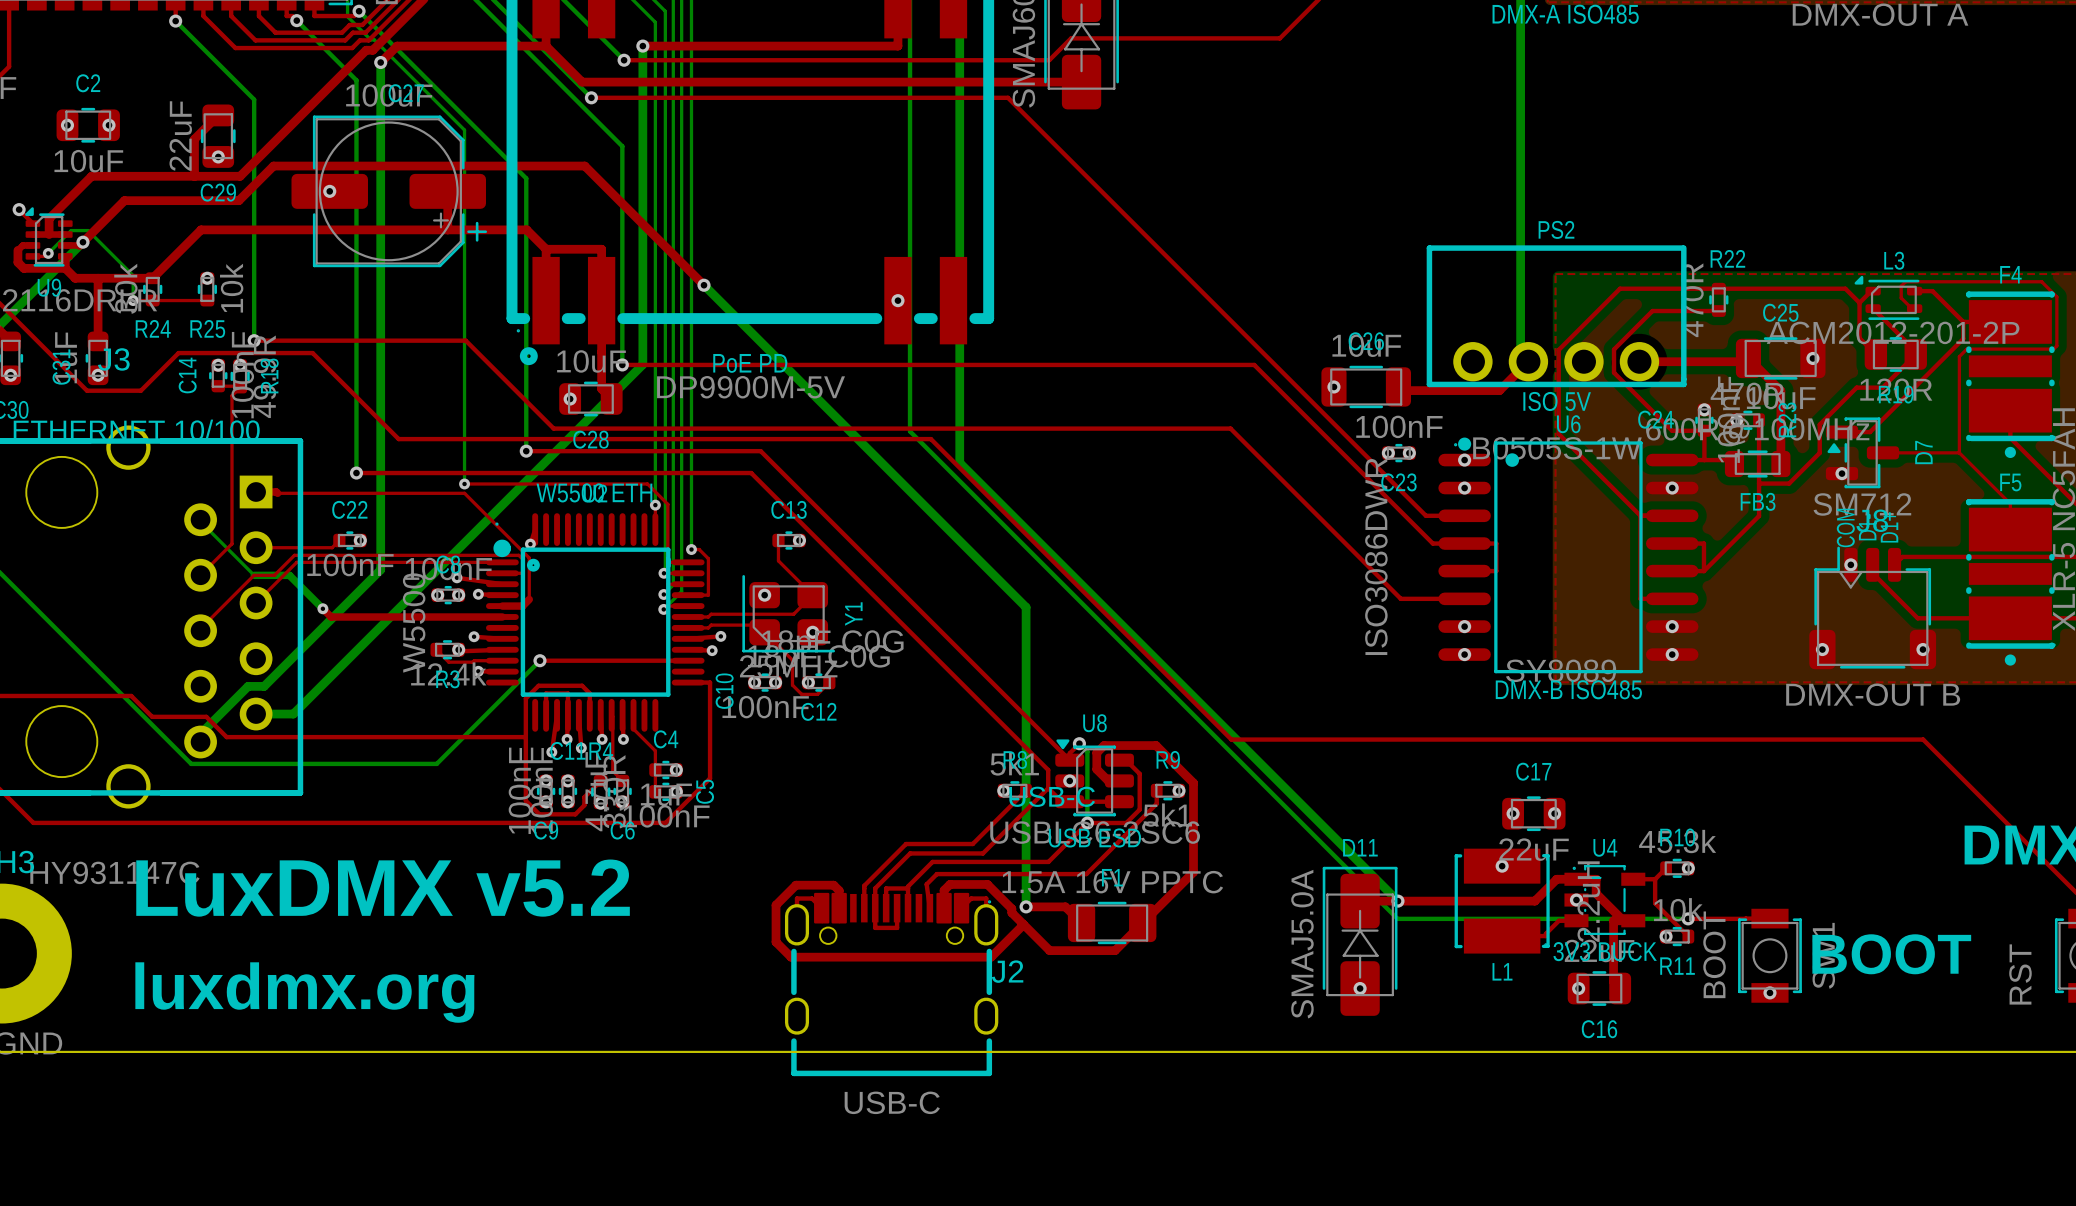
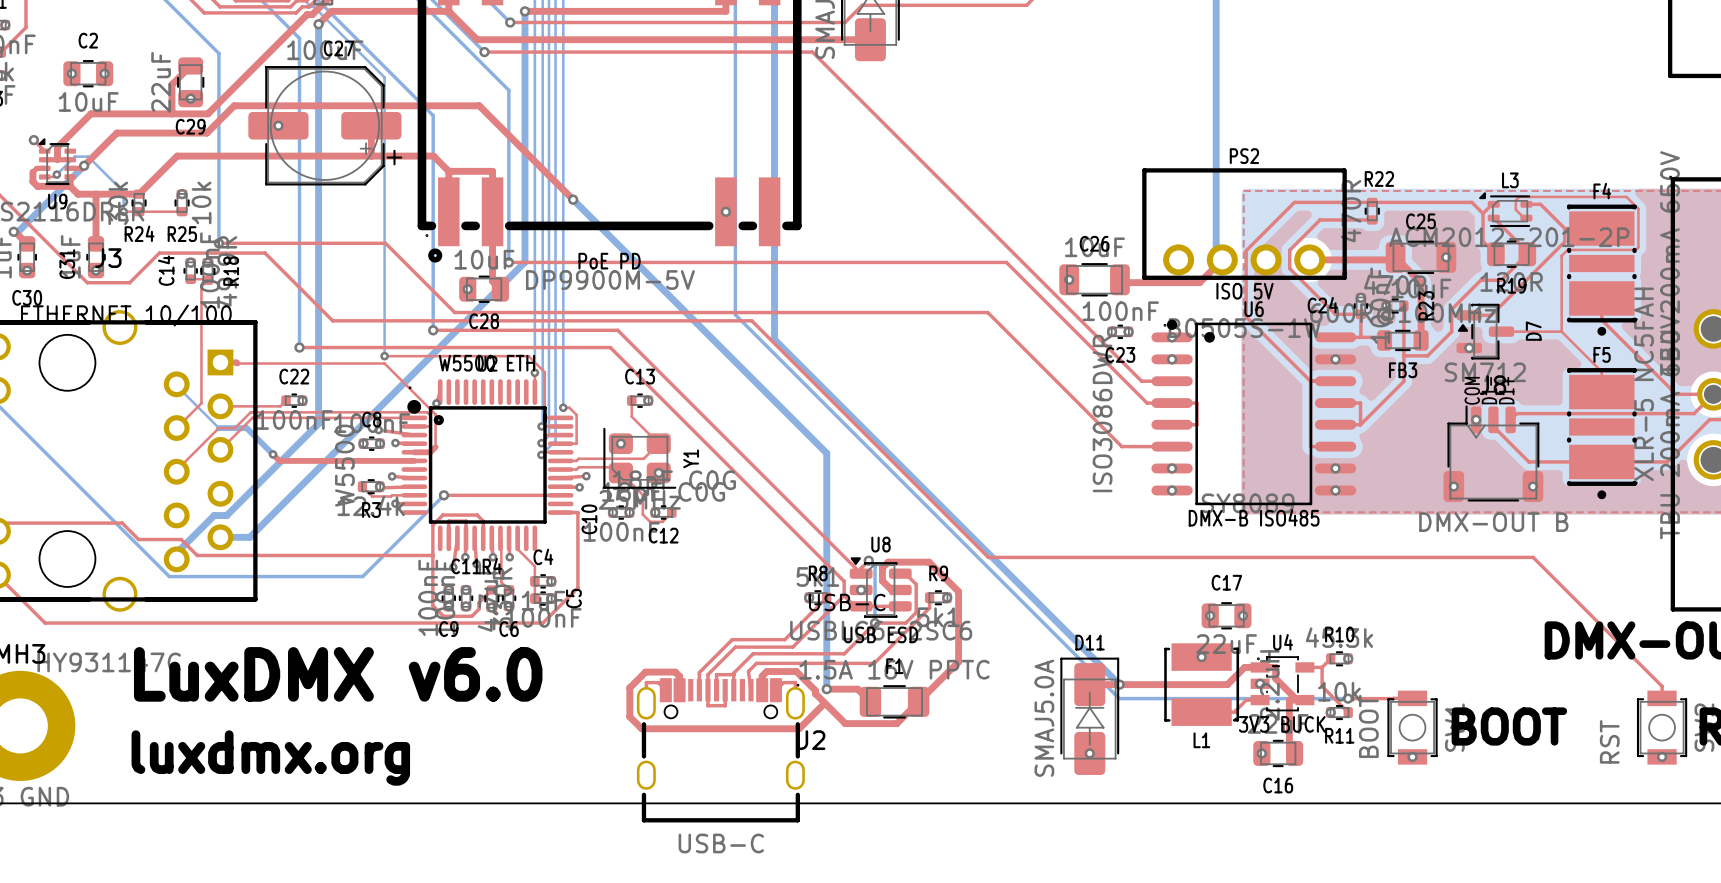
text: LuxDMX v5.2 (383, 888) -> LuxDMX v6.0 (338, 674)

